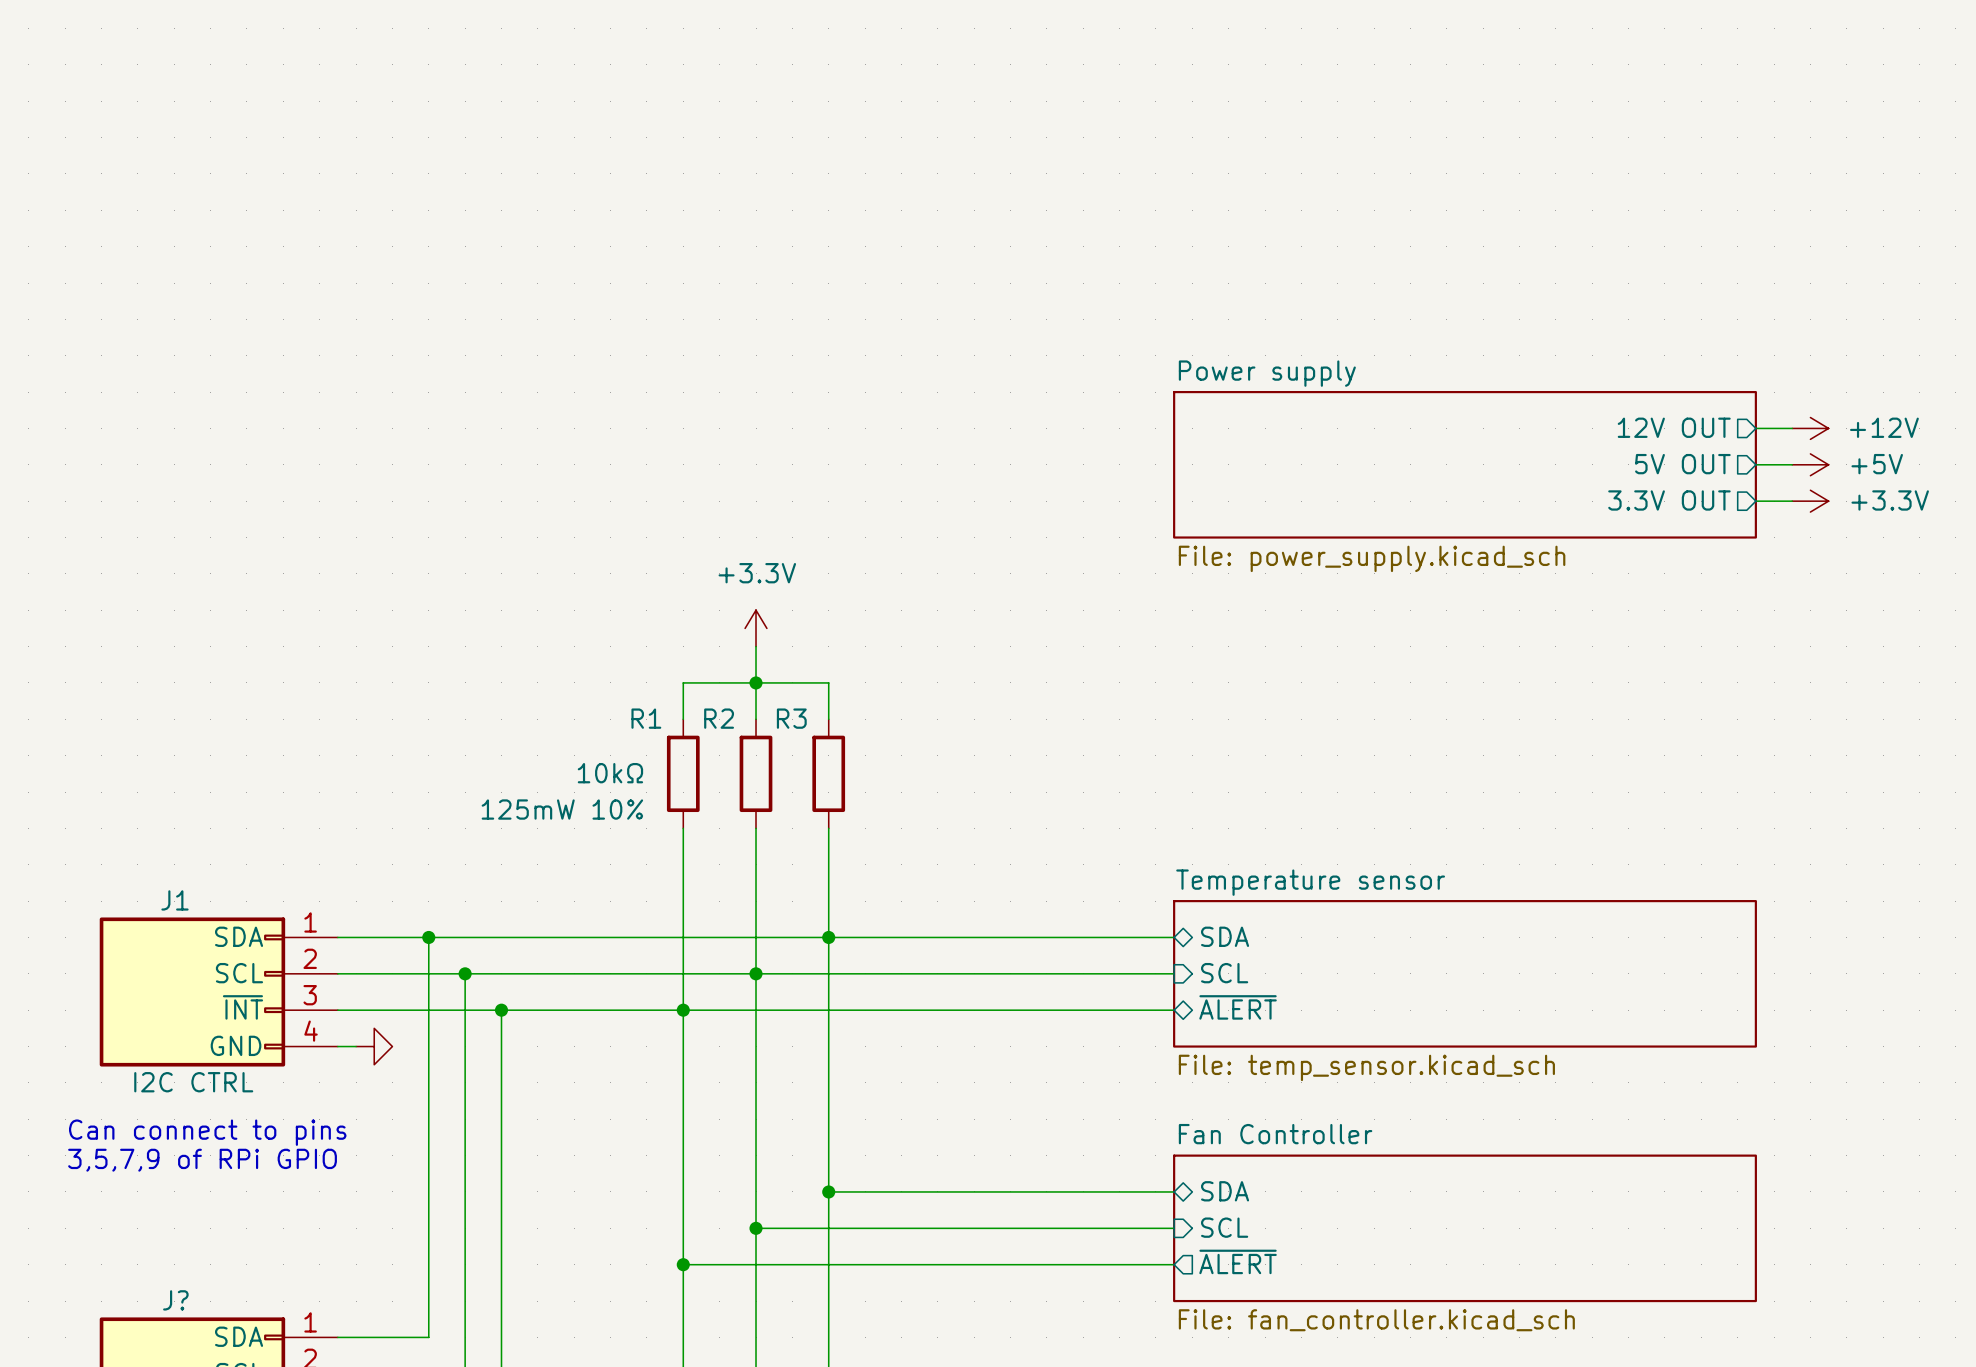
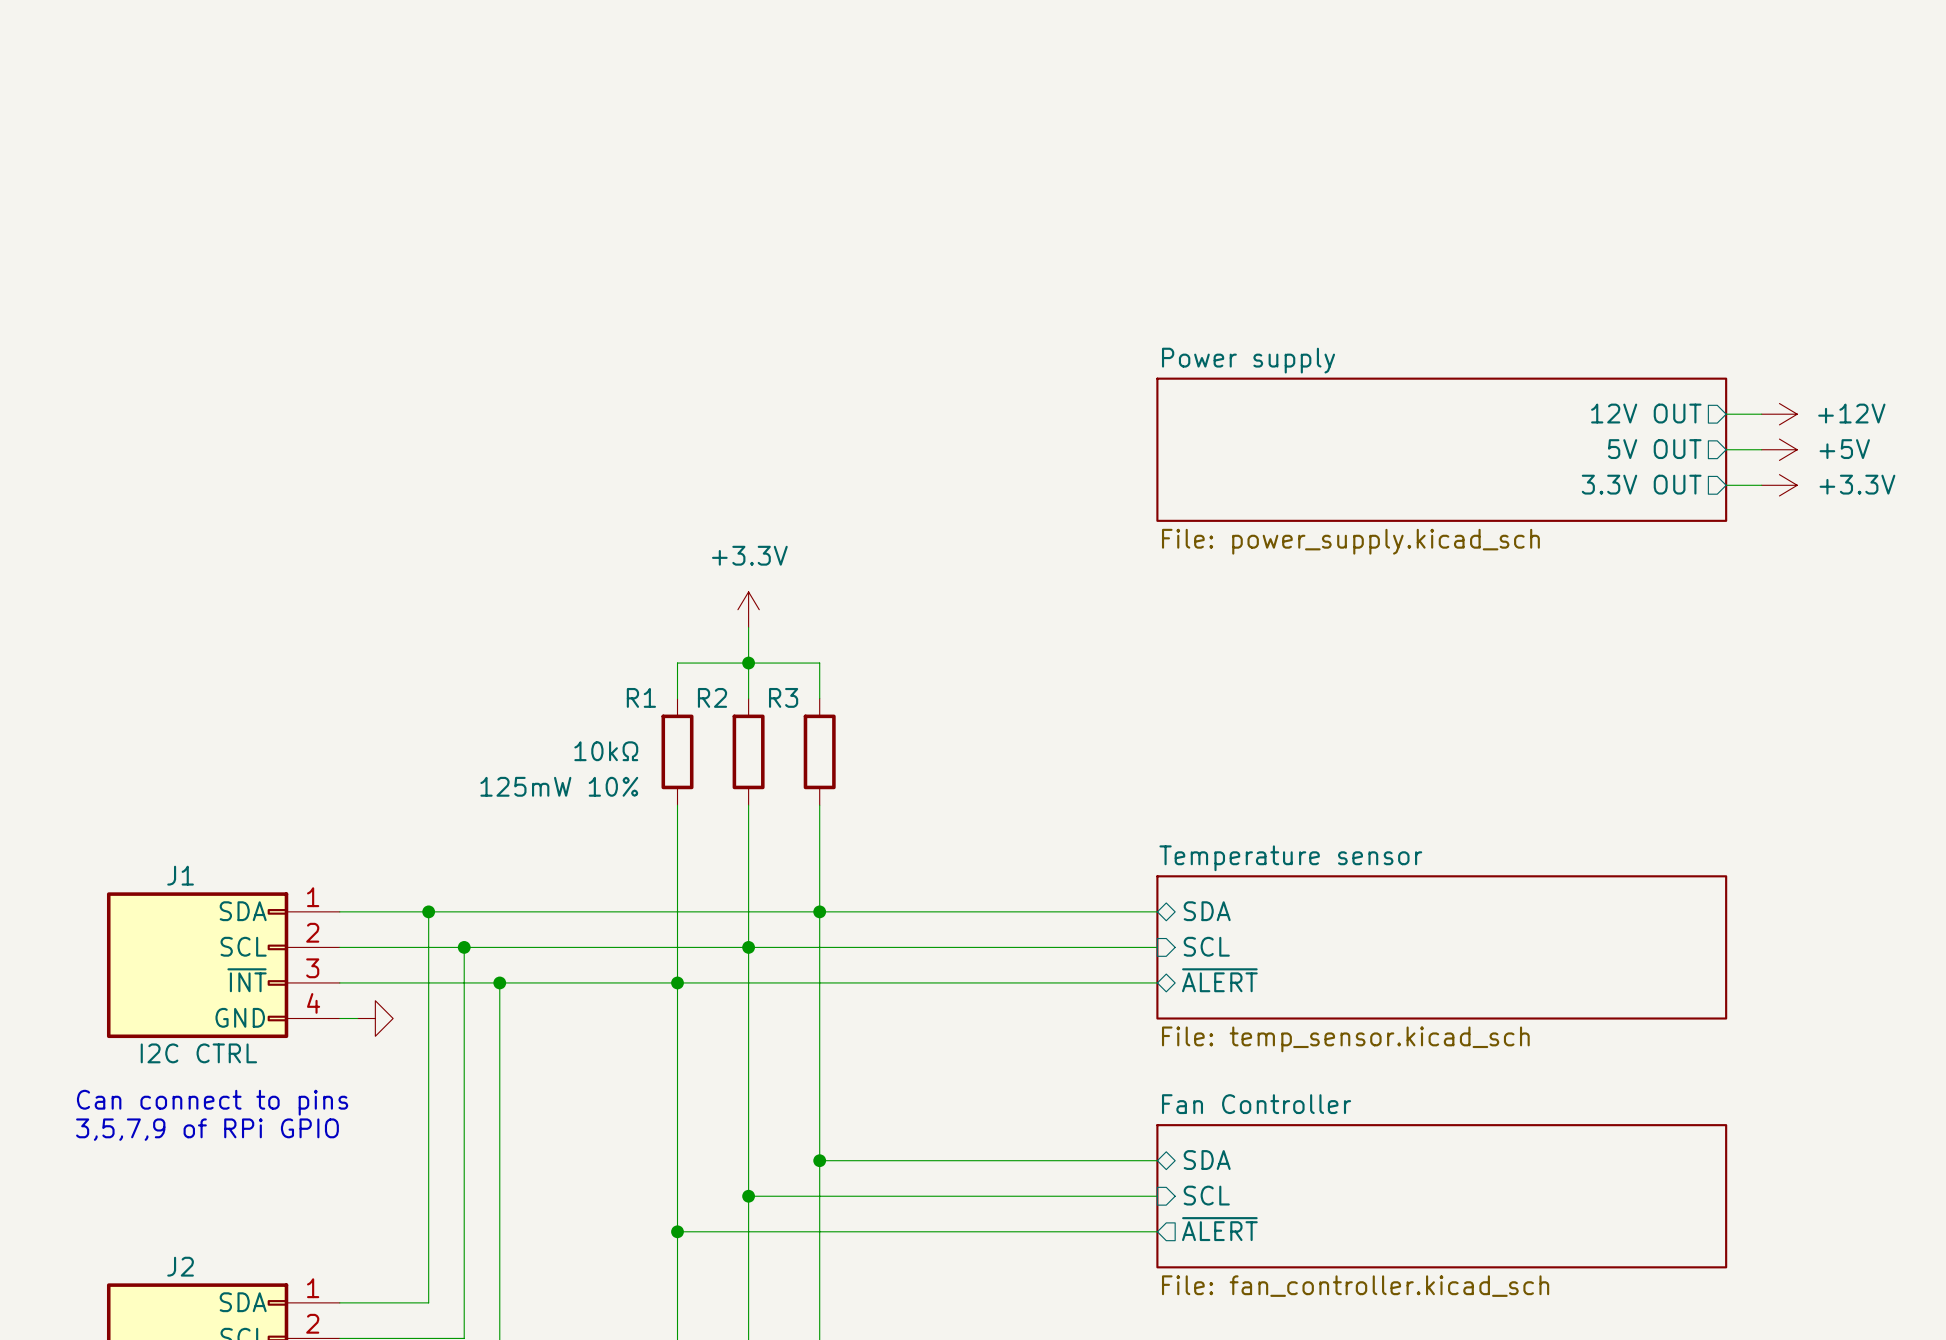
J? name: J? (175, 1300) -> J2 (180, 1266)

